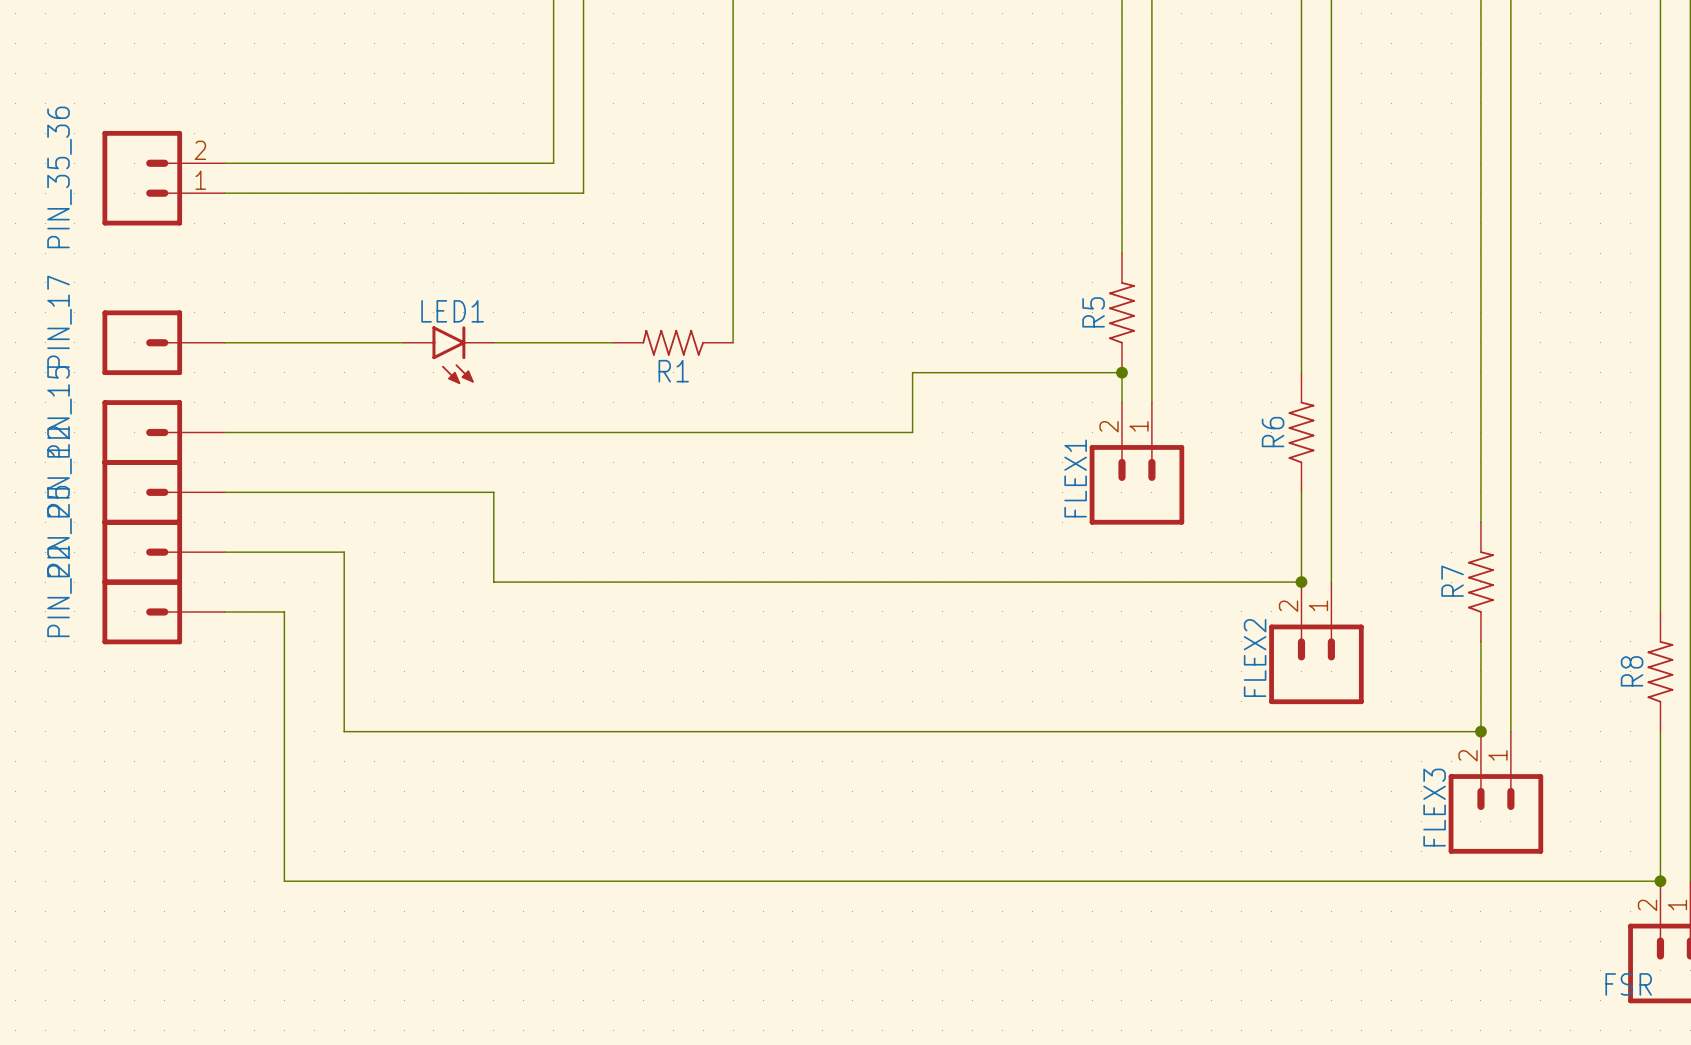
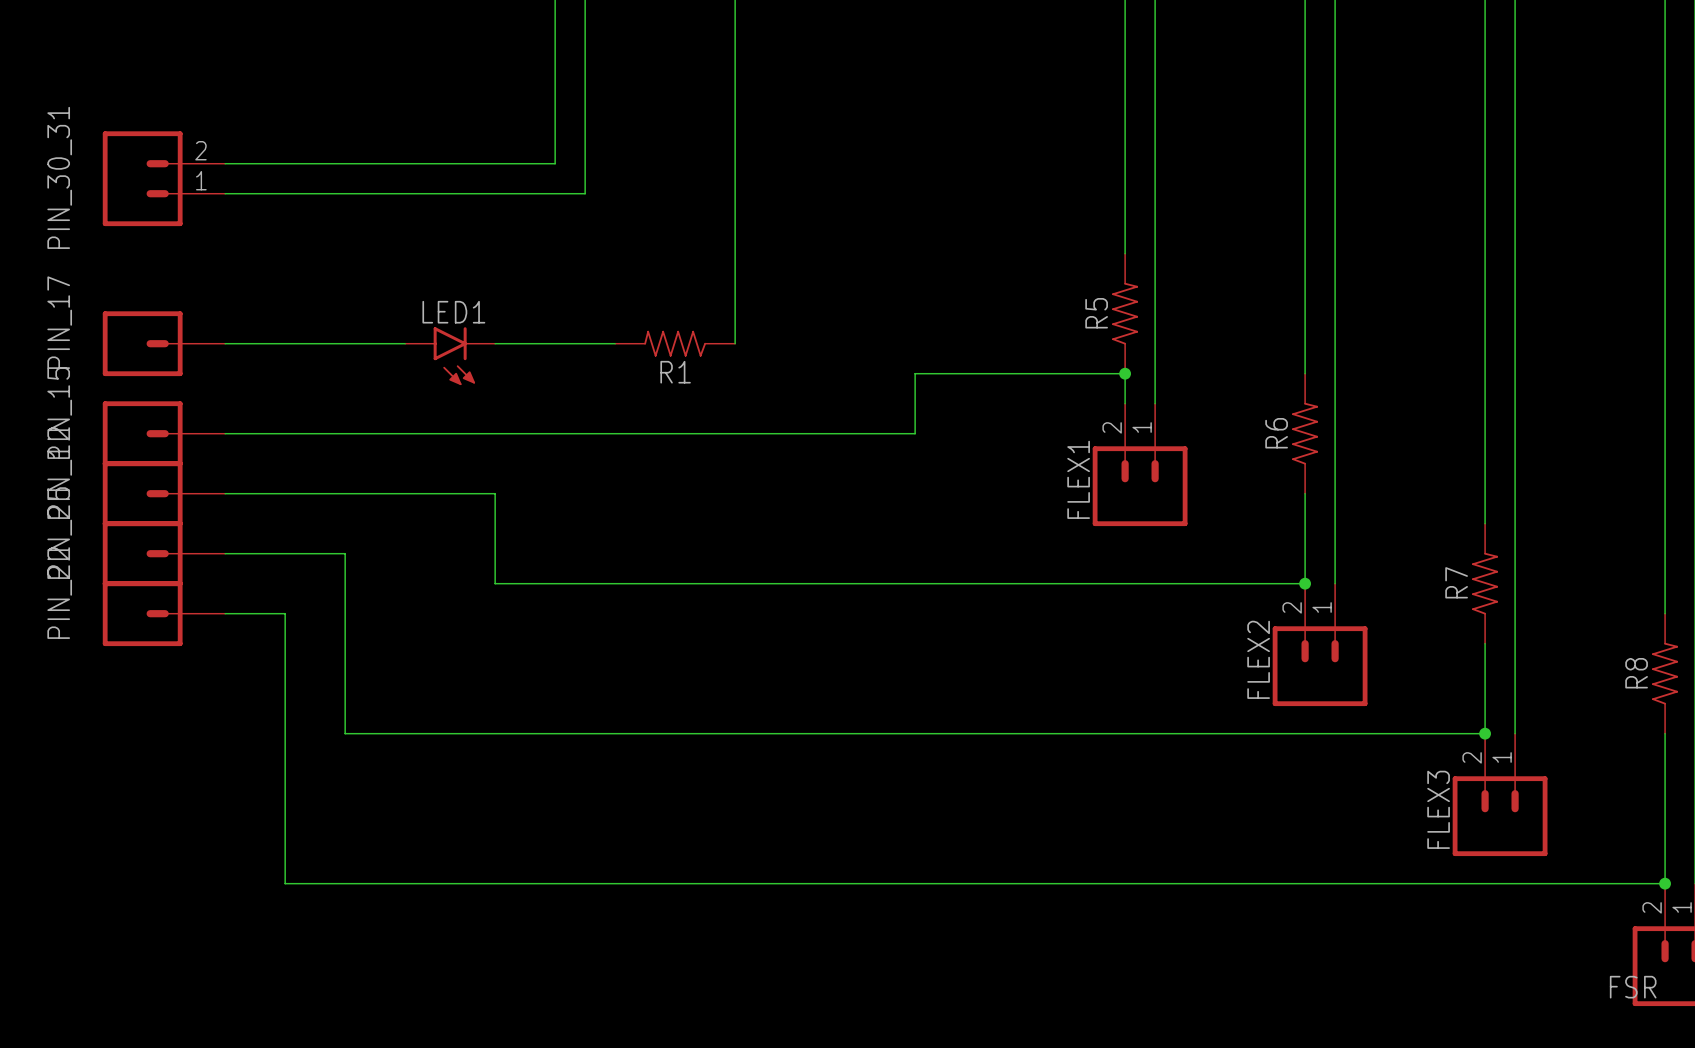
PIN_35_36 name: PIN_35_36 (59, 177) -> PIN_30_31 (59, 177)

